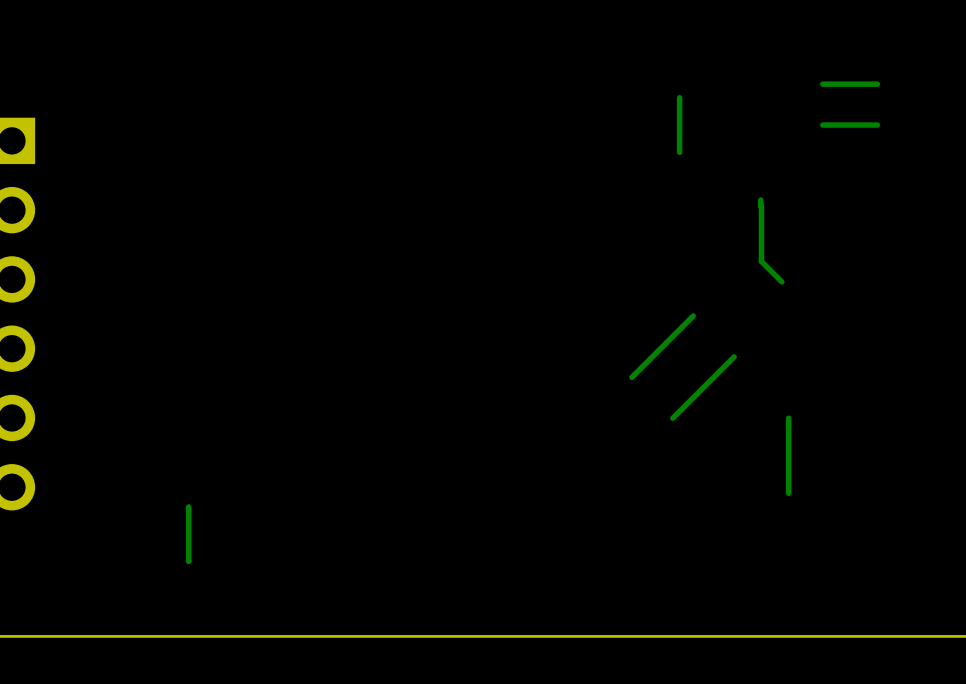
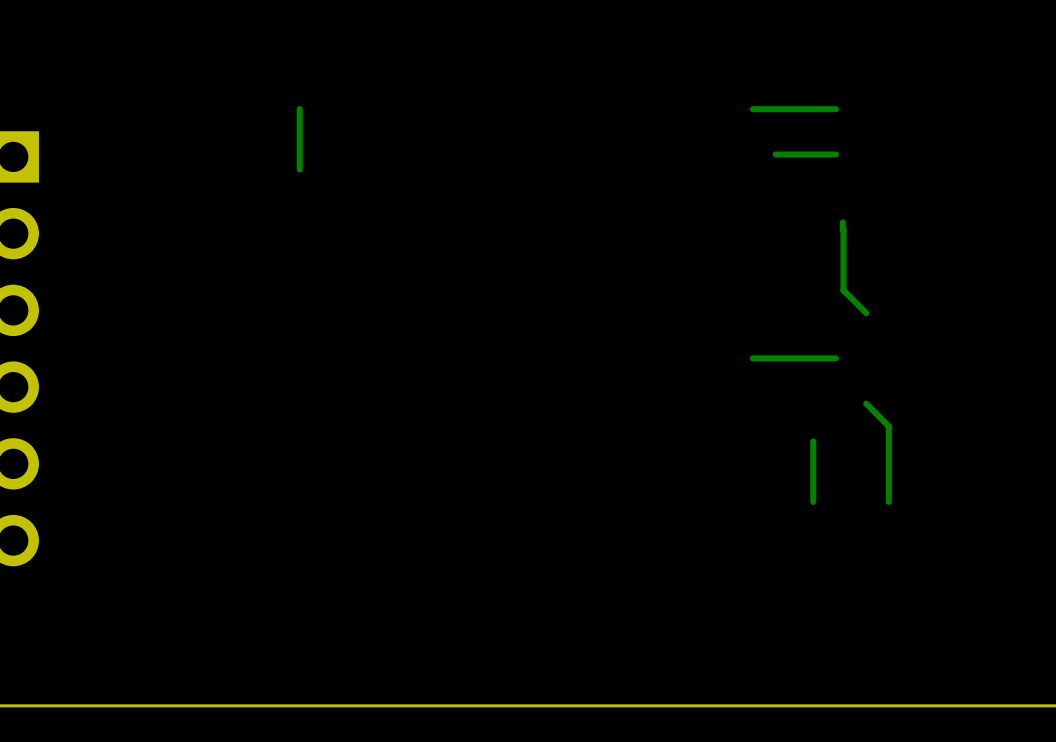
track: (877, 84) (822, 84) -> none
track: (679, 97) (679, 152) -> (752, 109) (835, 109)
track: (877, 125) (822, 125) -> (835, 154) (775, 154)
track: (693, 315) (631, 377) -> none
track: none -> (835, 358) (752, 358)
track: (734, 356) (672, 418) -> none
track: none -> (866, 403) (888, 426) (888, 501)
track: none -> (813, 441) (813, 501)
track: (788, 418) (788, 493) -> none
track: (188, 506) (188, 561) -> (299, 109) (299, 169)

